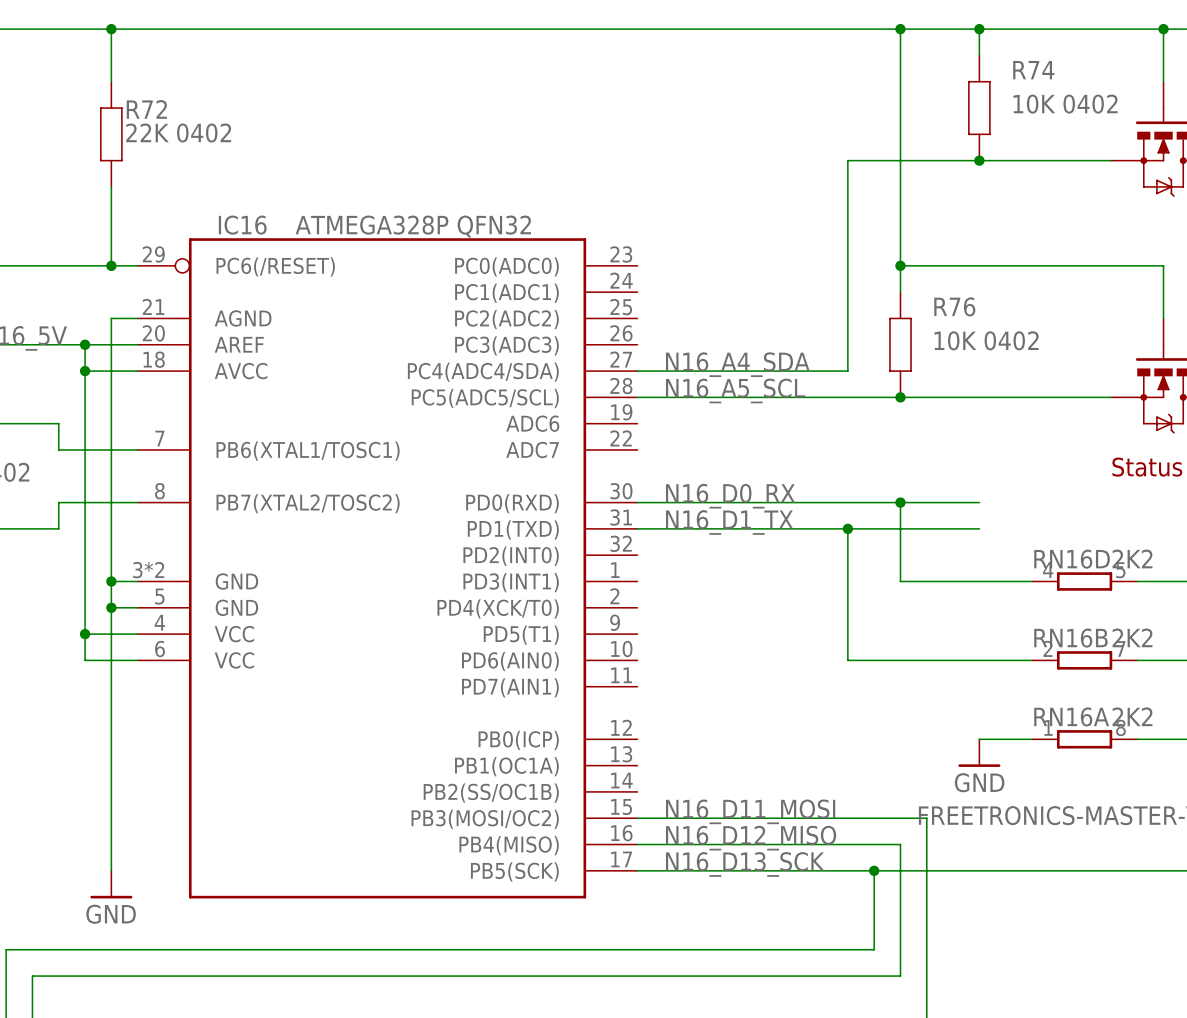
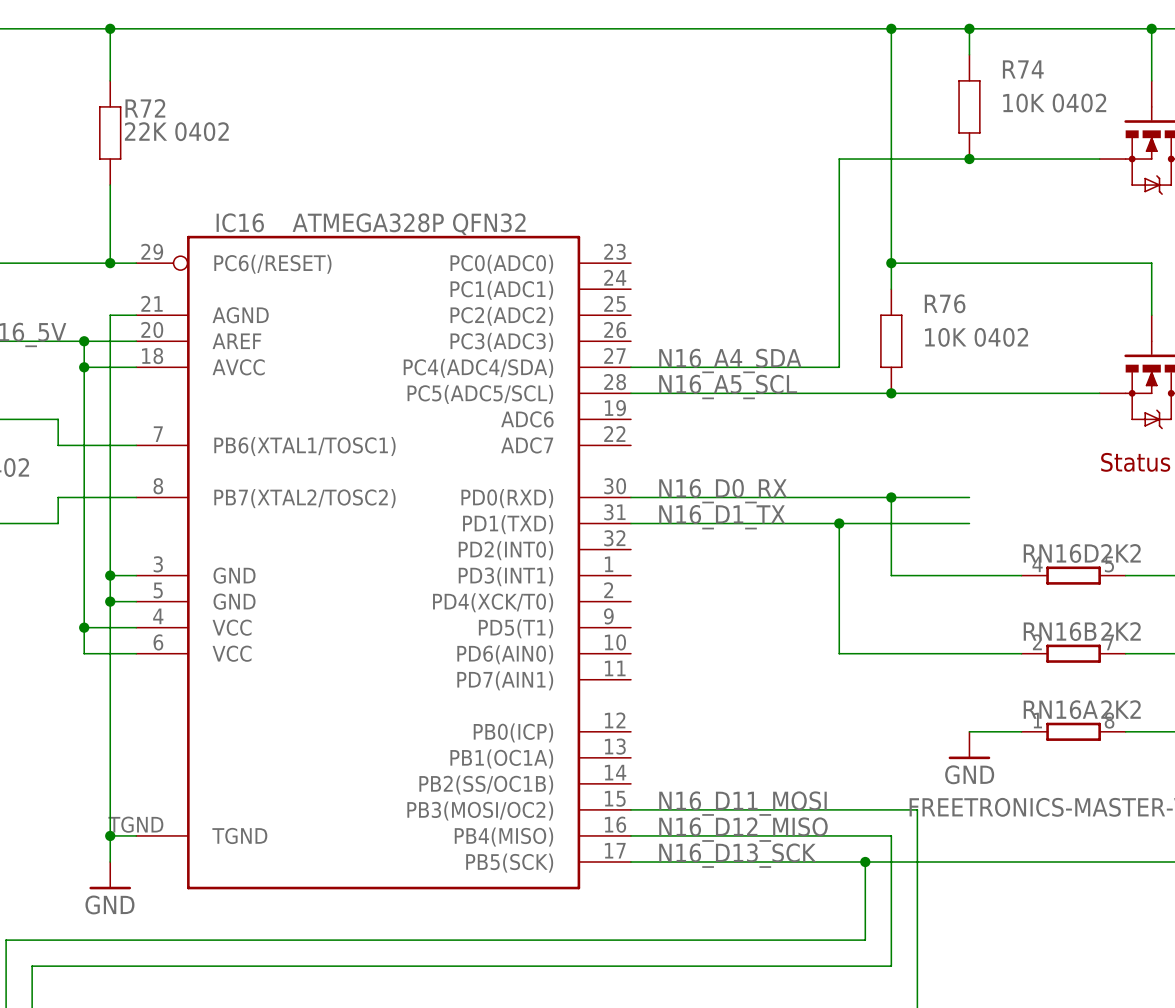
IC16 symbol: [137, 238, 638, 899] -> [136, 235, 631, 890]
wire: none -> (110, 835) (136, 835)
junction: none -> (110, 835)

